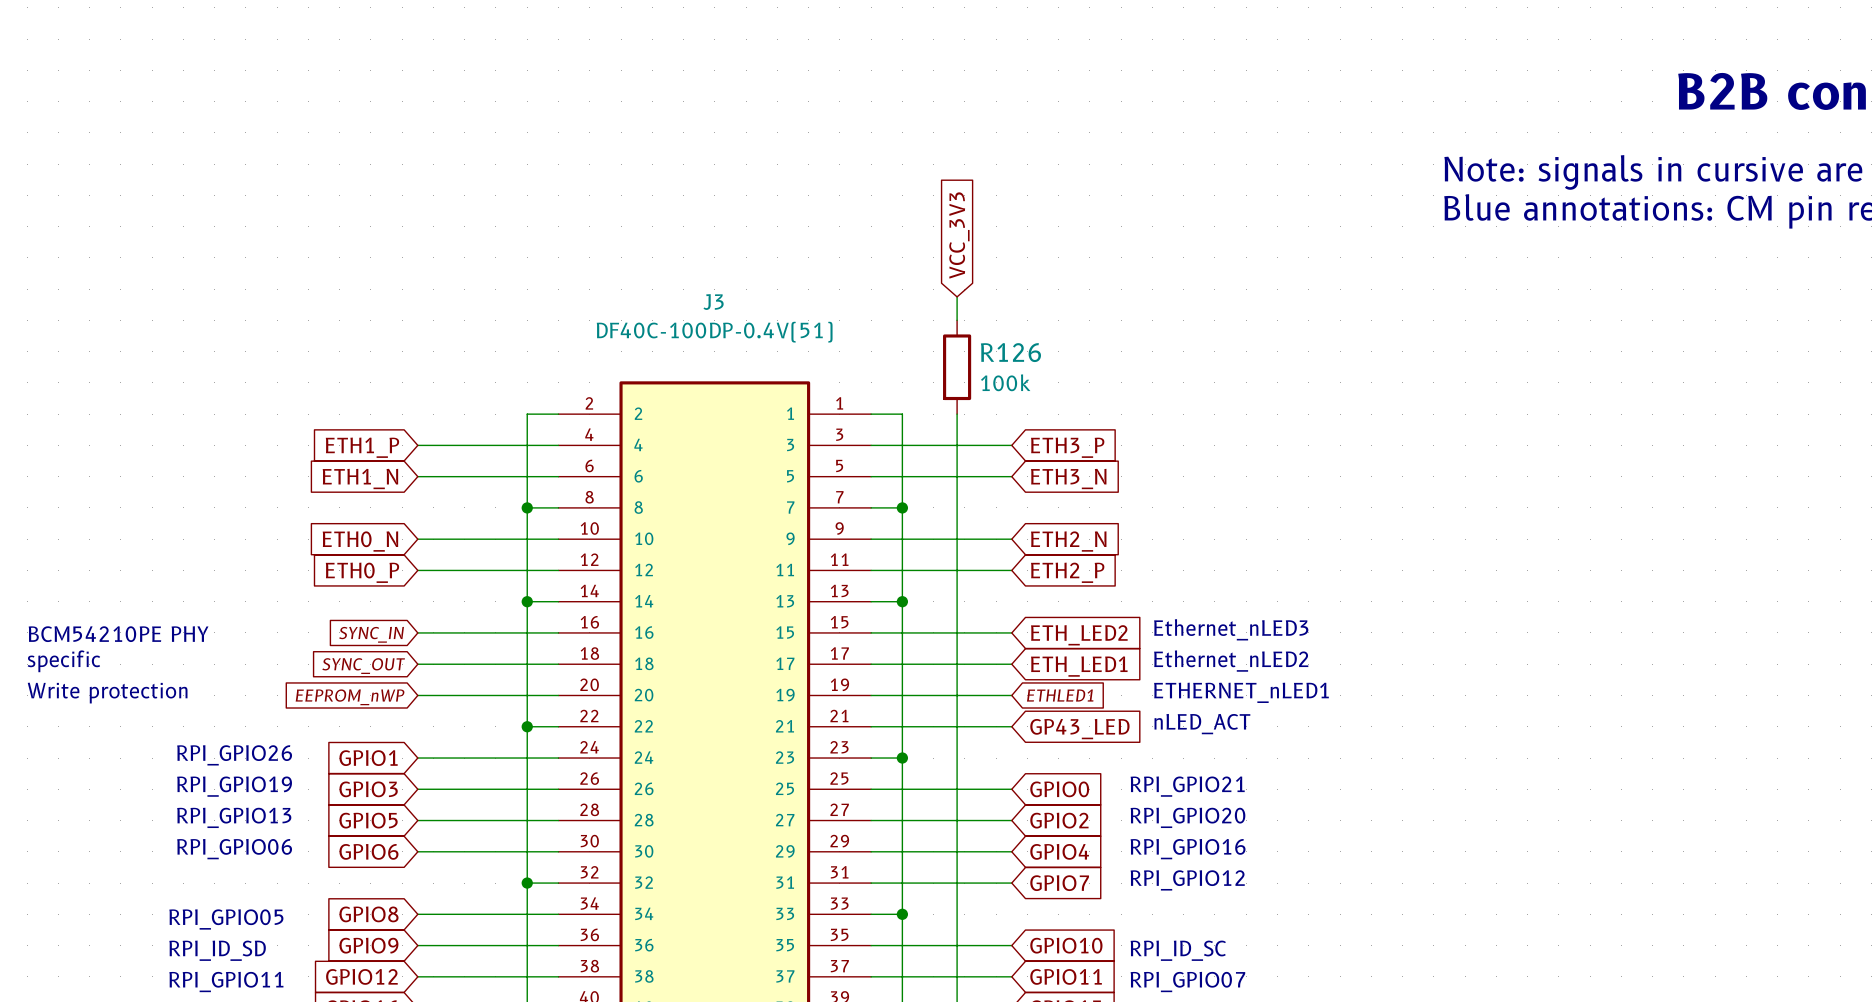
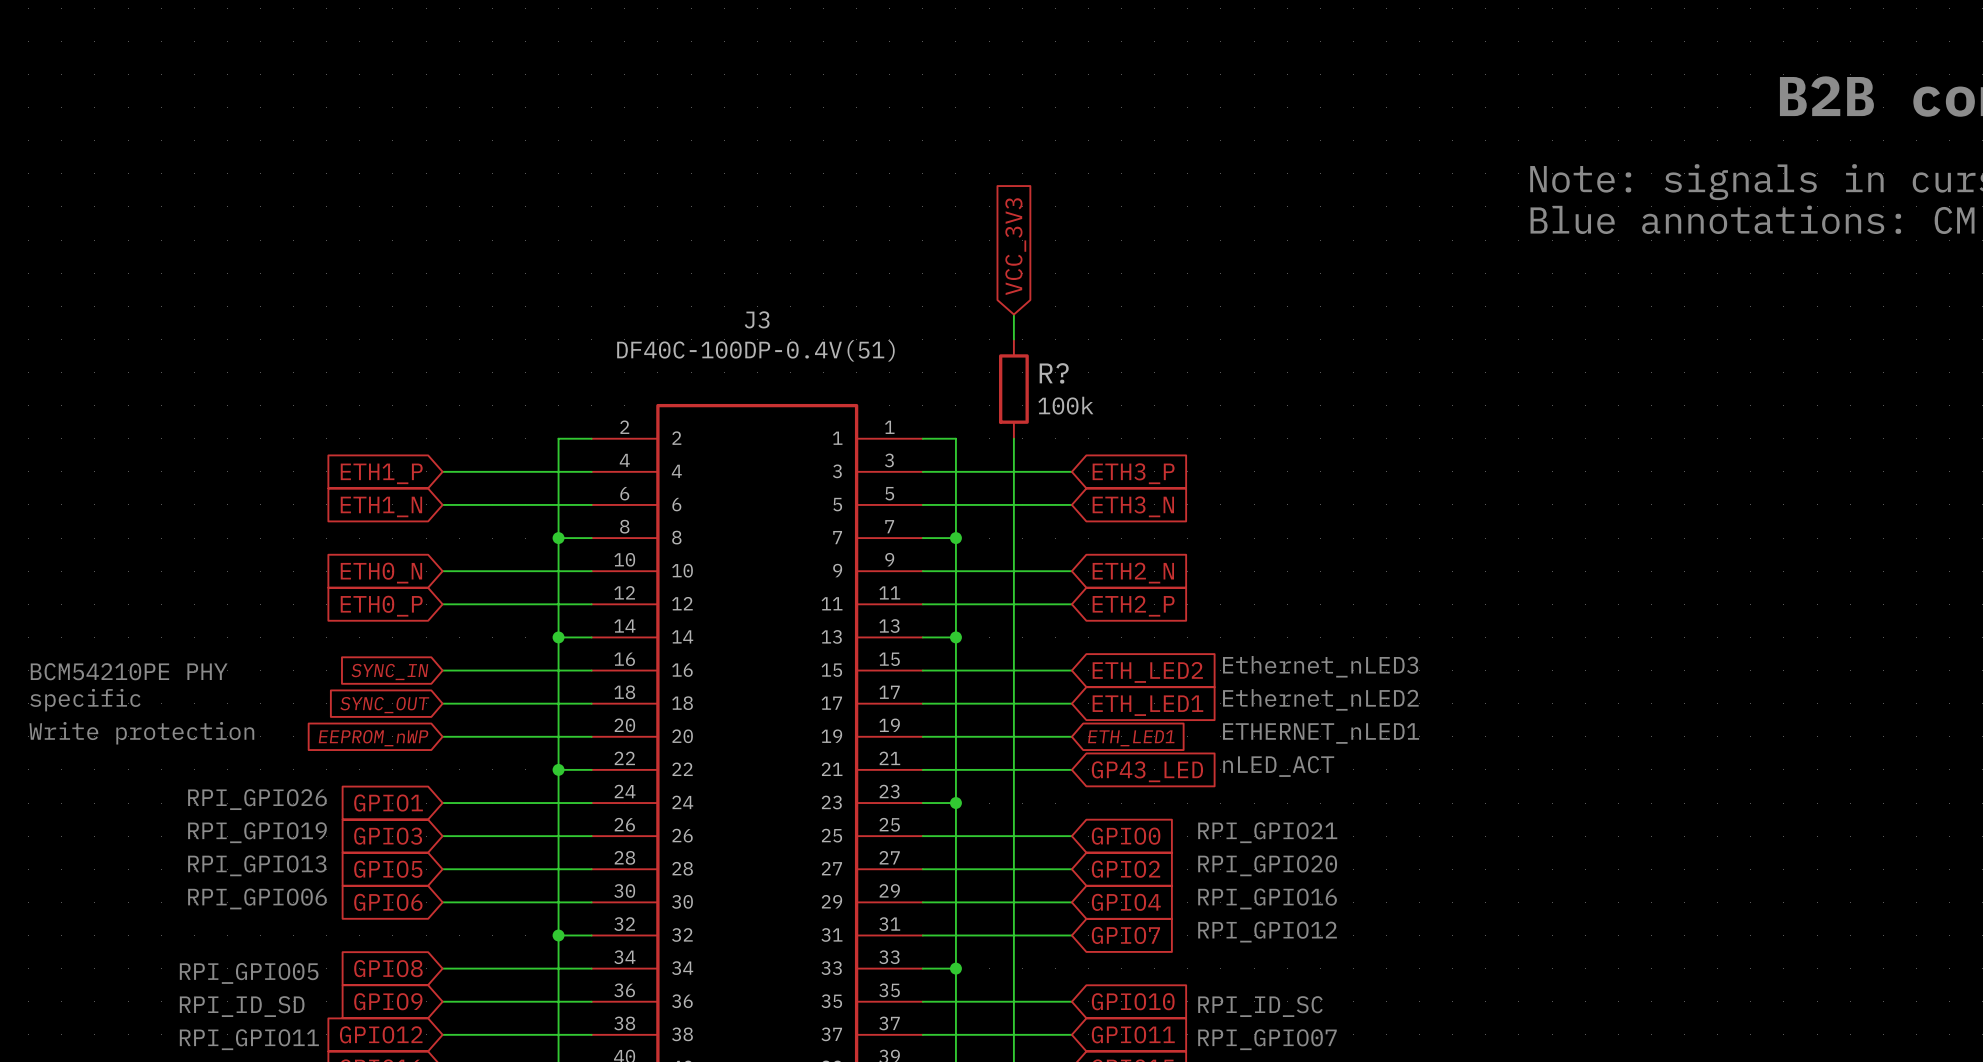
R126 name: R126 (1010, 352) -> R? (1054, 373)
global label: ETHLED1 (1060, 695) -> ETH_LED1 (1131, 738)

